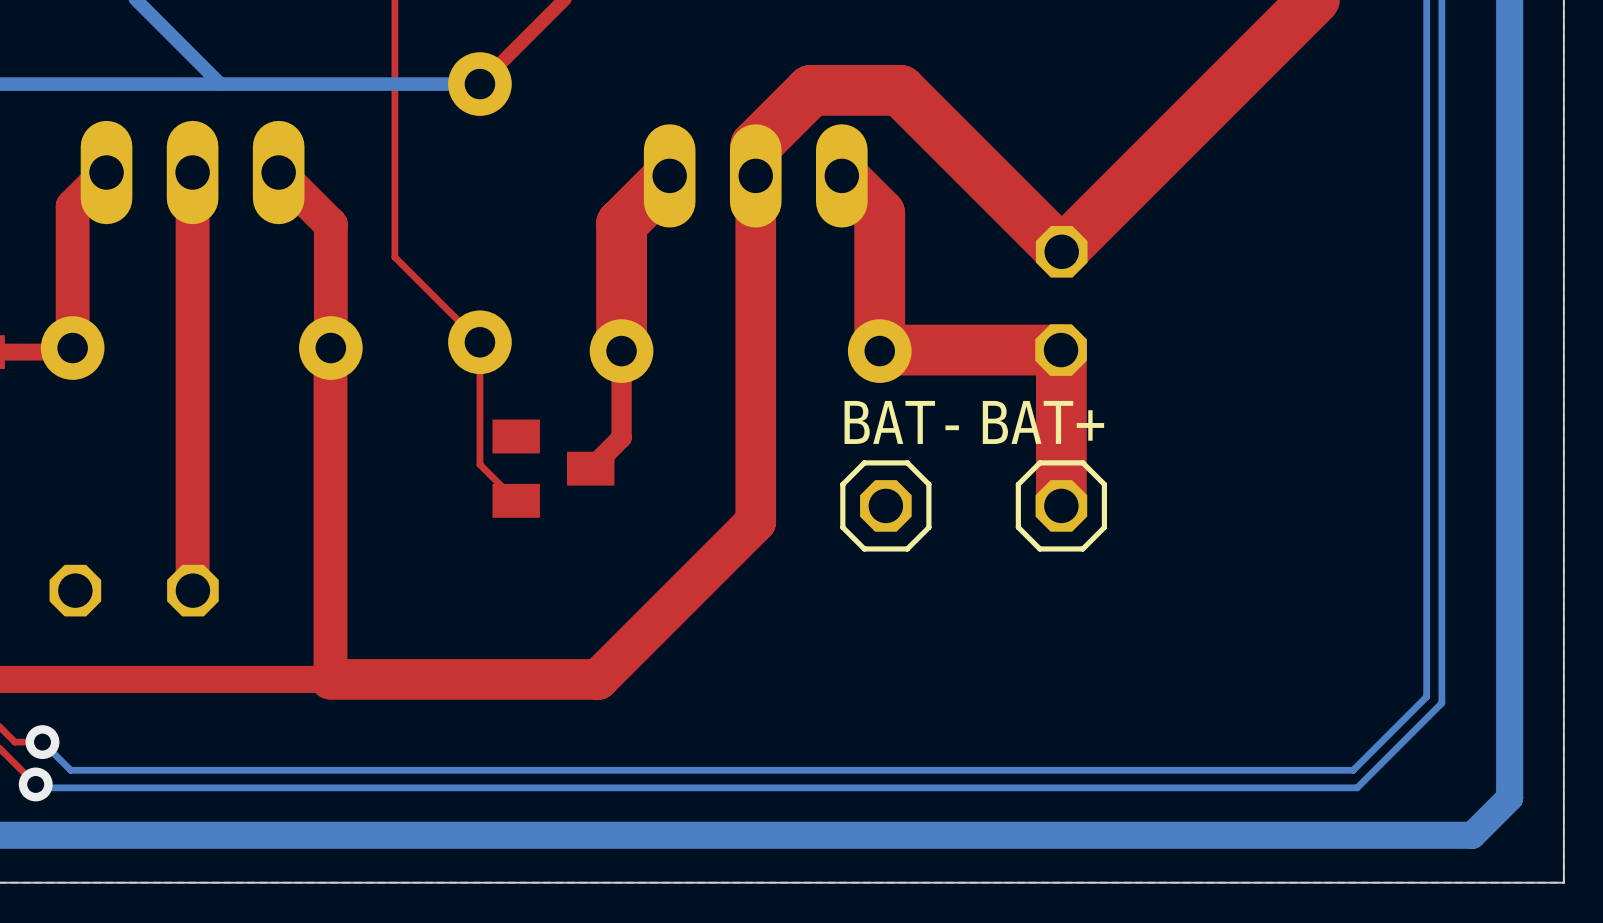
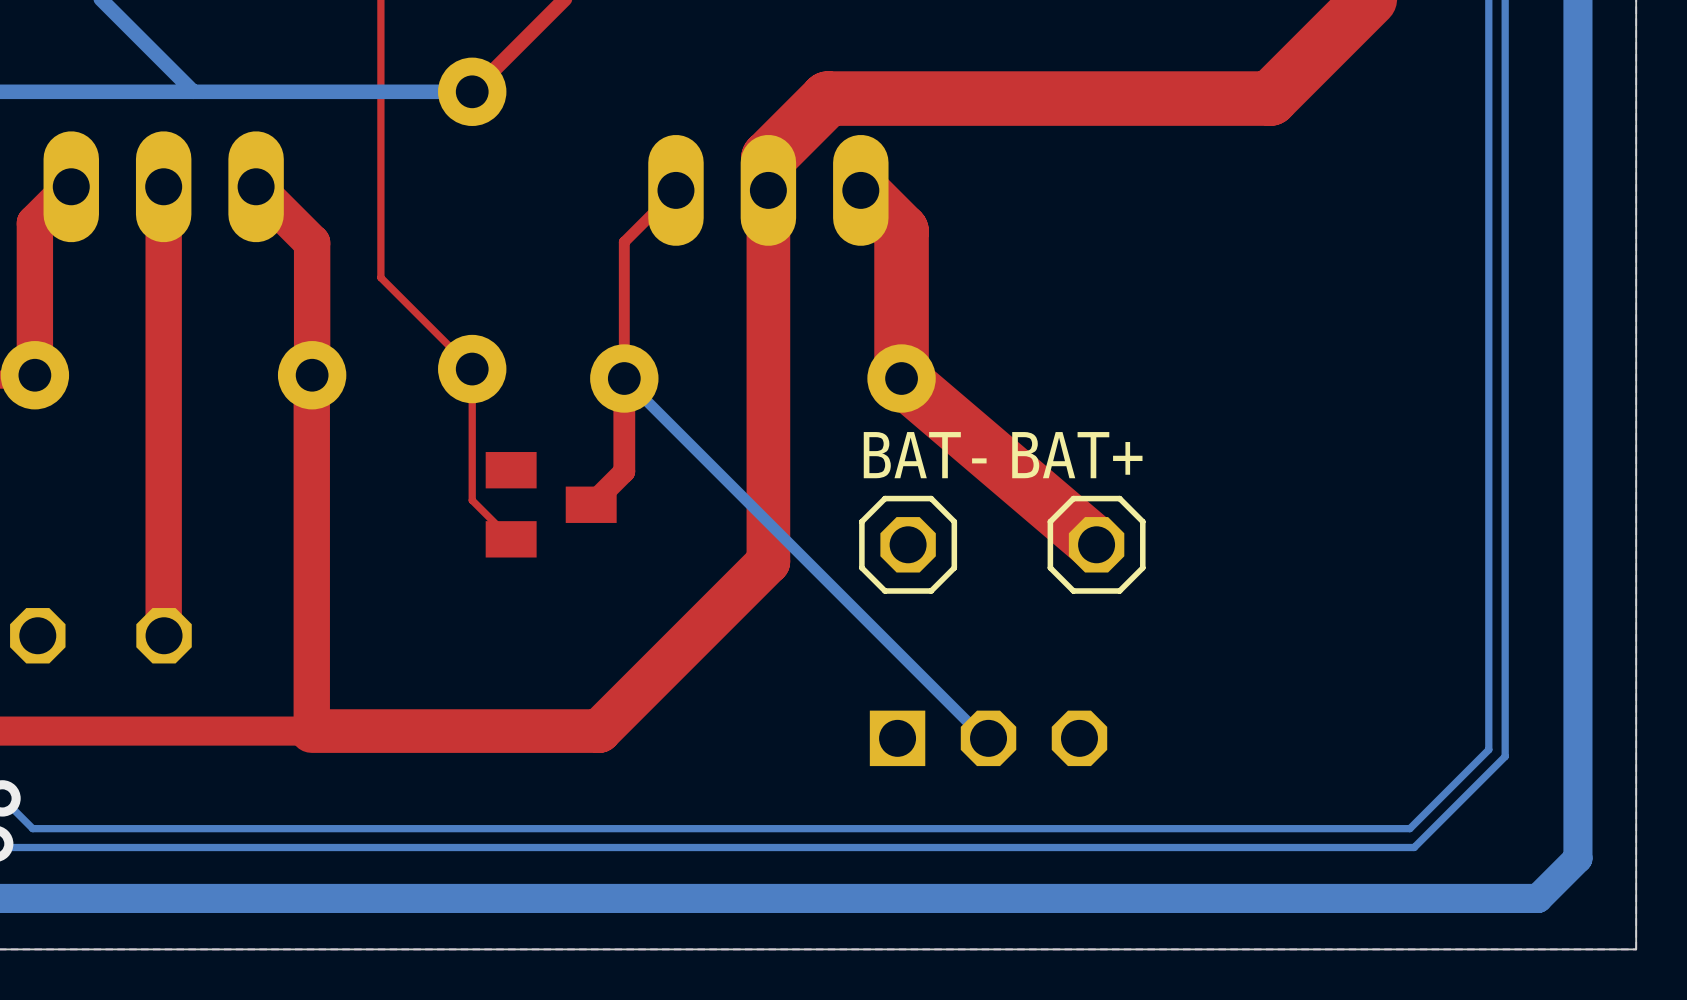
top track: (1223, 90) (1061, 251) (900, 90) -> (1270, 98) (923, 98)
top track width: thick (669, 175) (621, 224) (621, 351) -> thin (675, 190) (624, 242) (624, 378)
part: (1061, 251) -> none
top track: (1061, 350) (879, 351) -> (1096, 544) (901, 378)
top track: (1061, 350) (1061, 505) -> none
part: (1061, 350) -> none
bottom track: none -> (624, 378) (984, 738) (988, 738)
part: none -> (988, 738)

